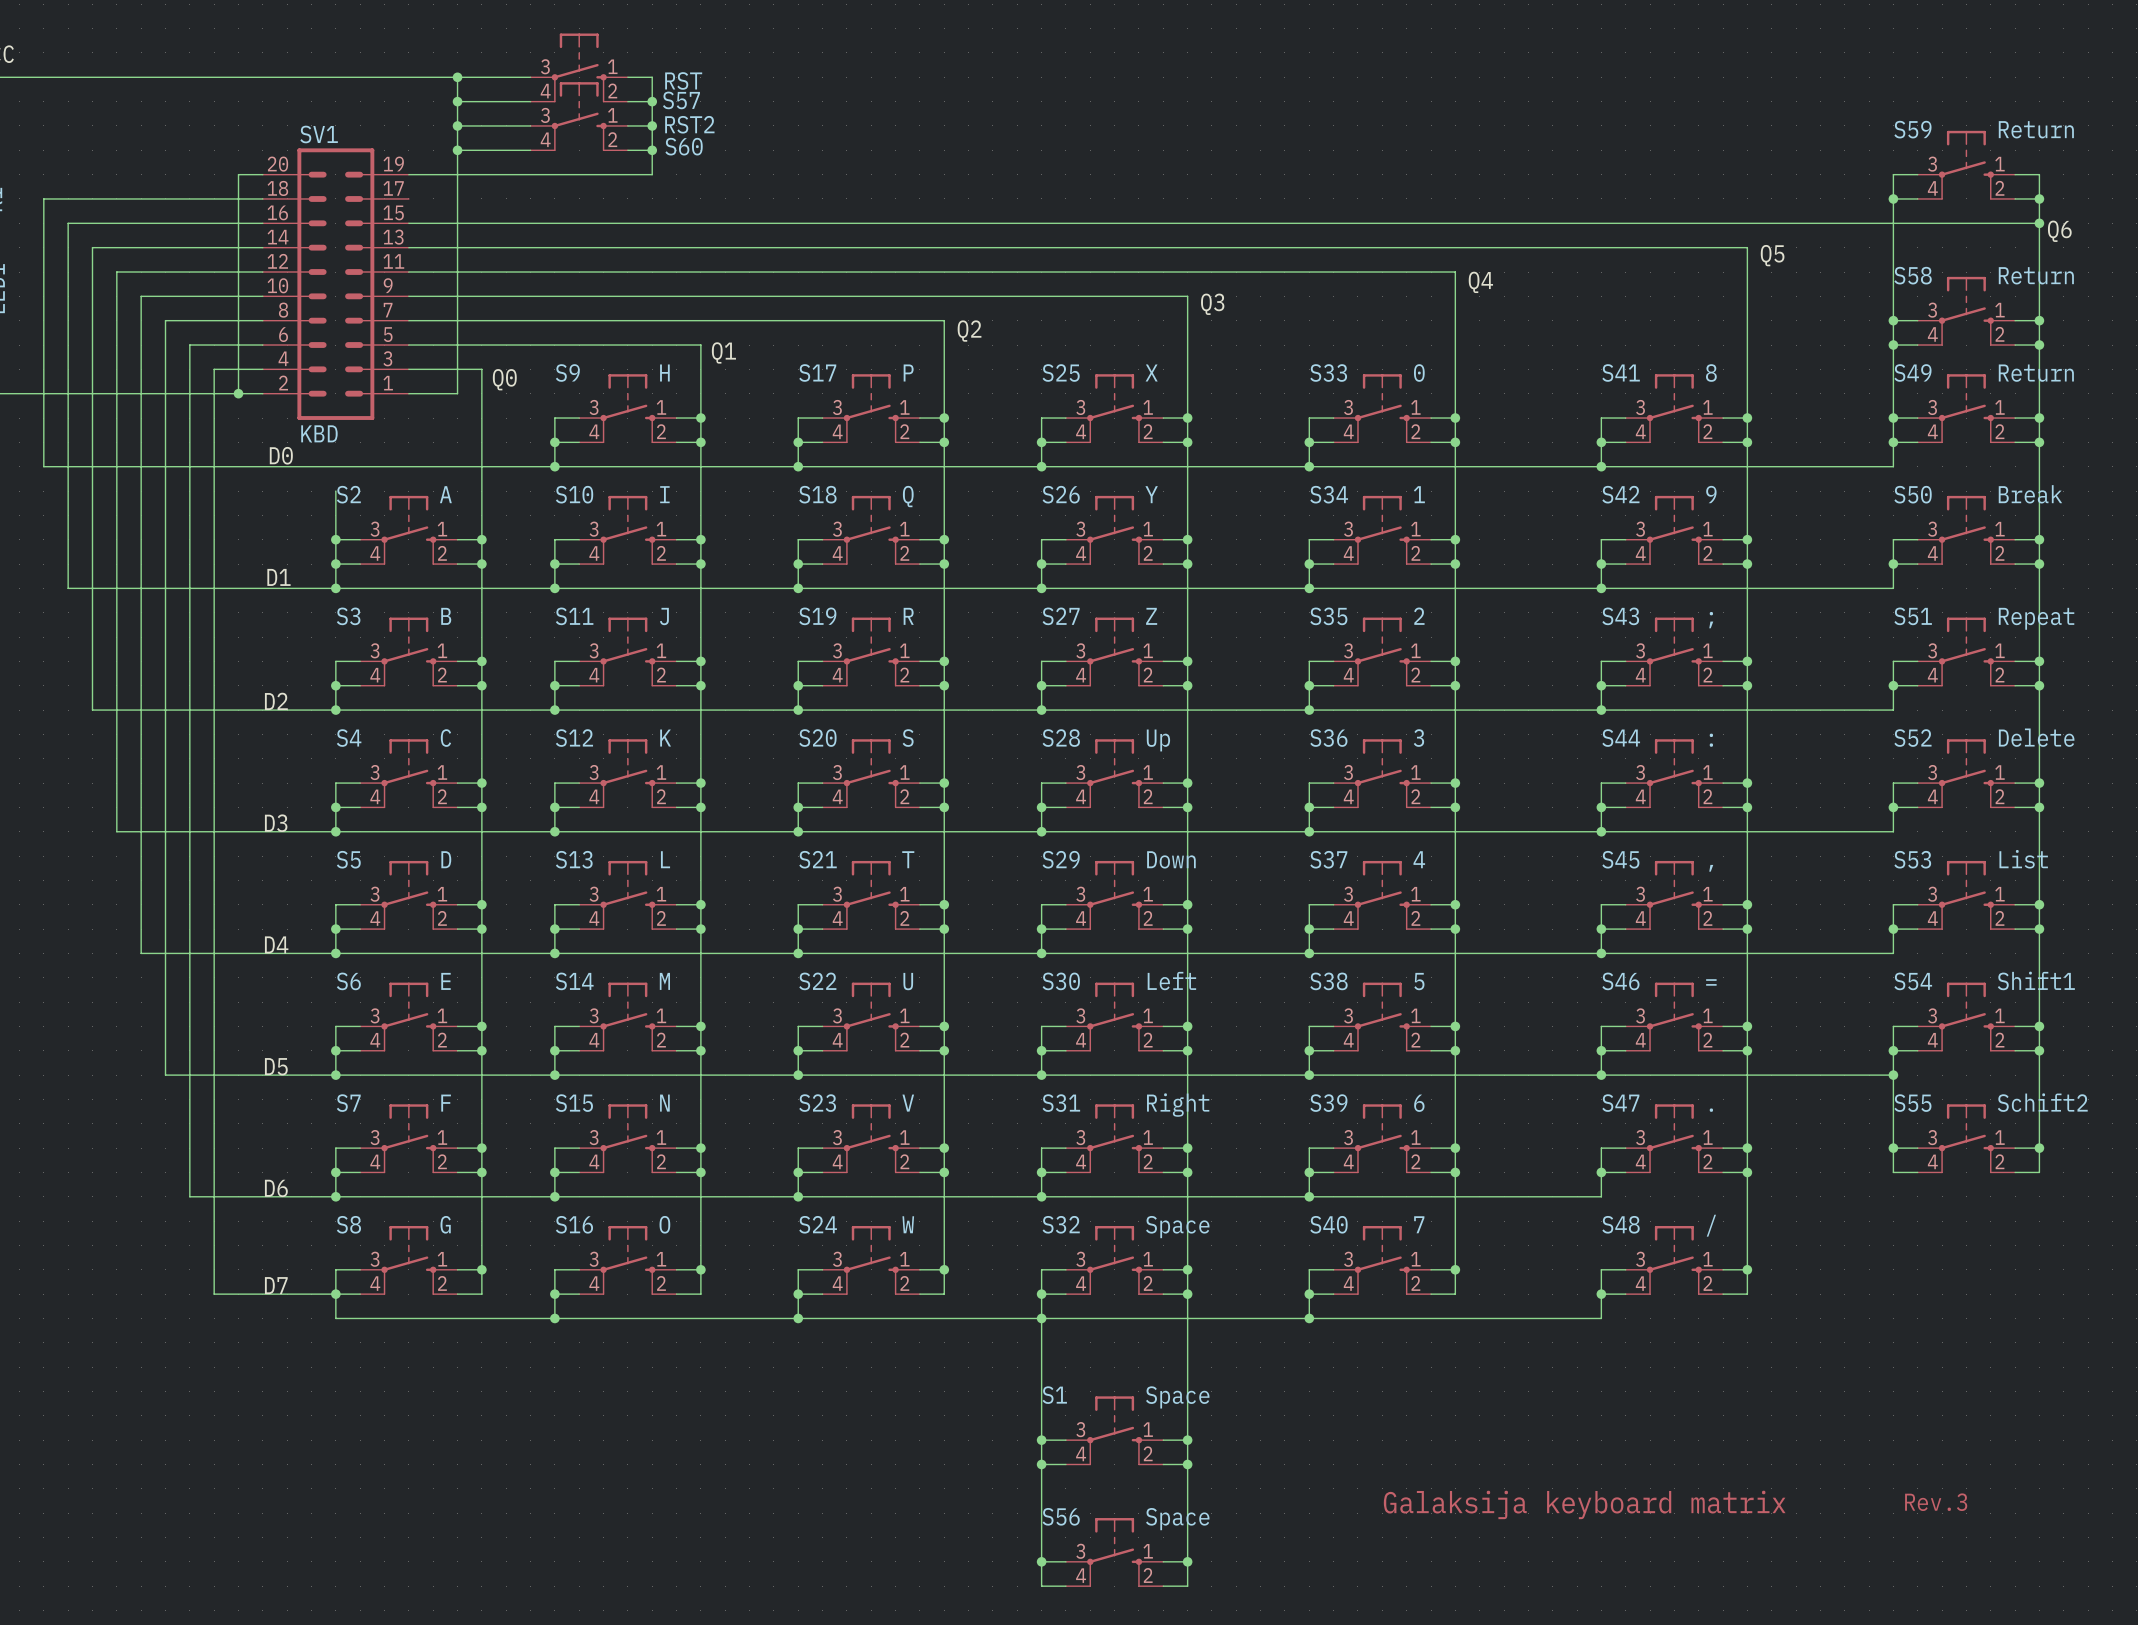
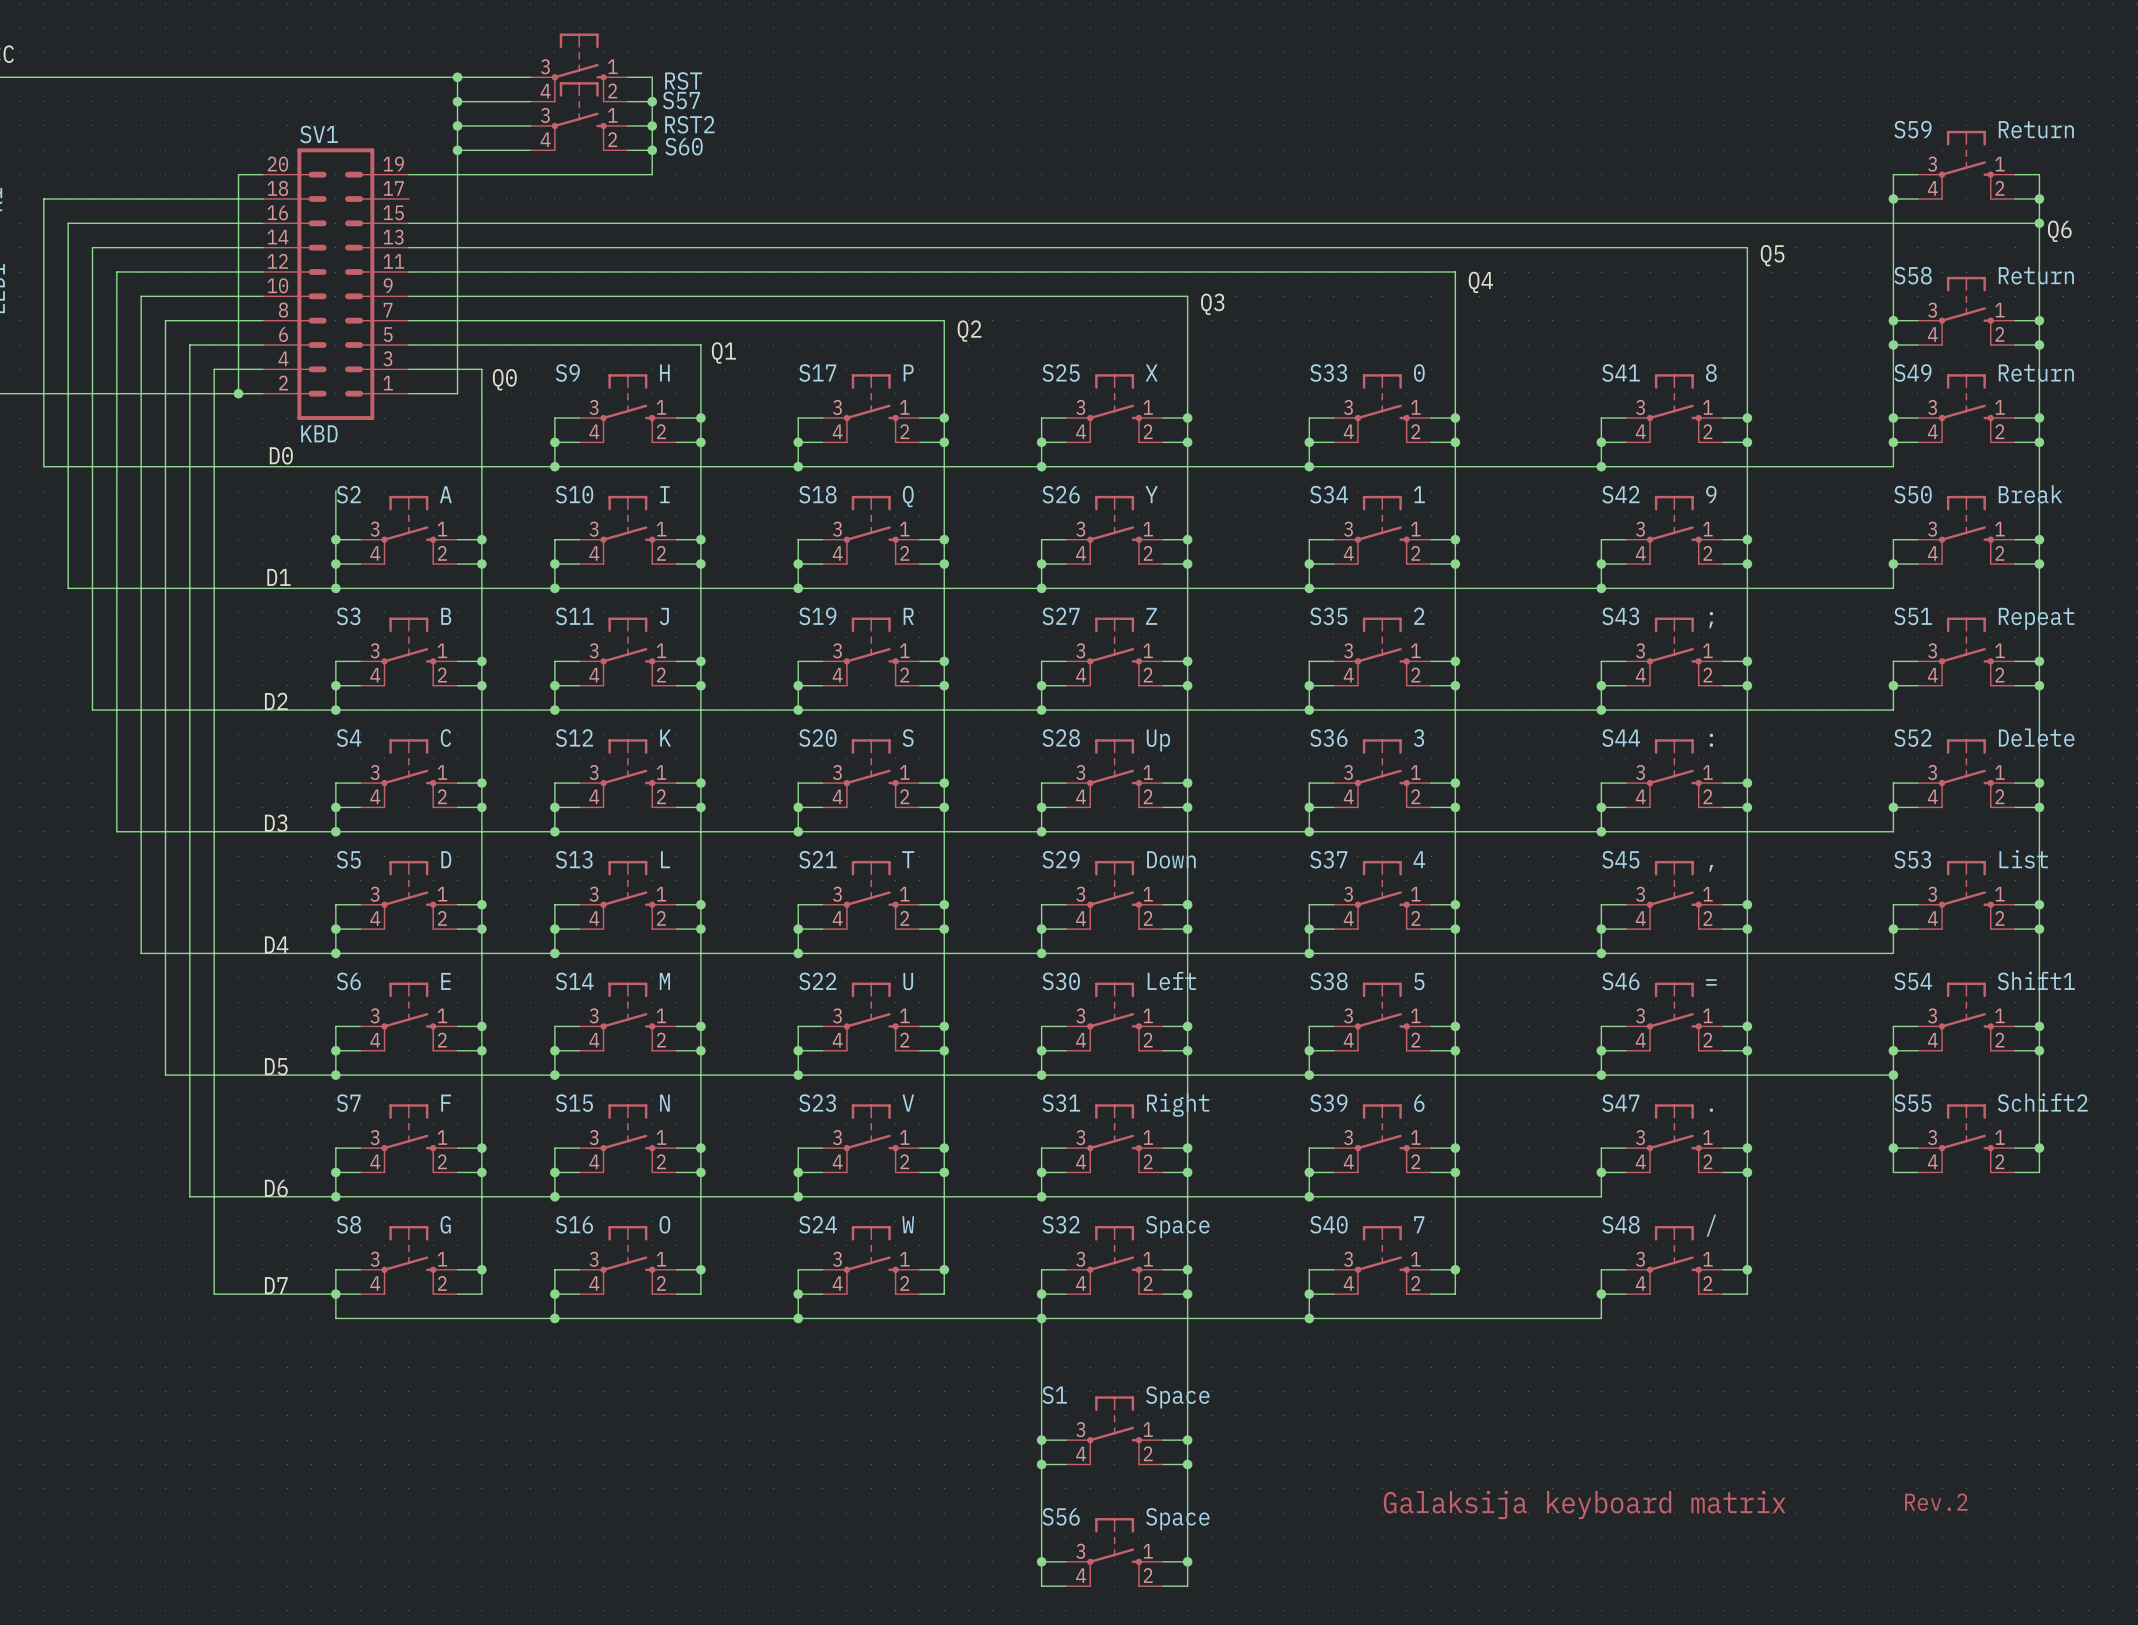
text: Rev.3 (1936, 1502) -> Rev.2 (1936, 1502)

